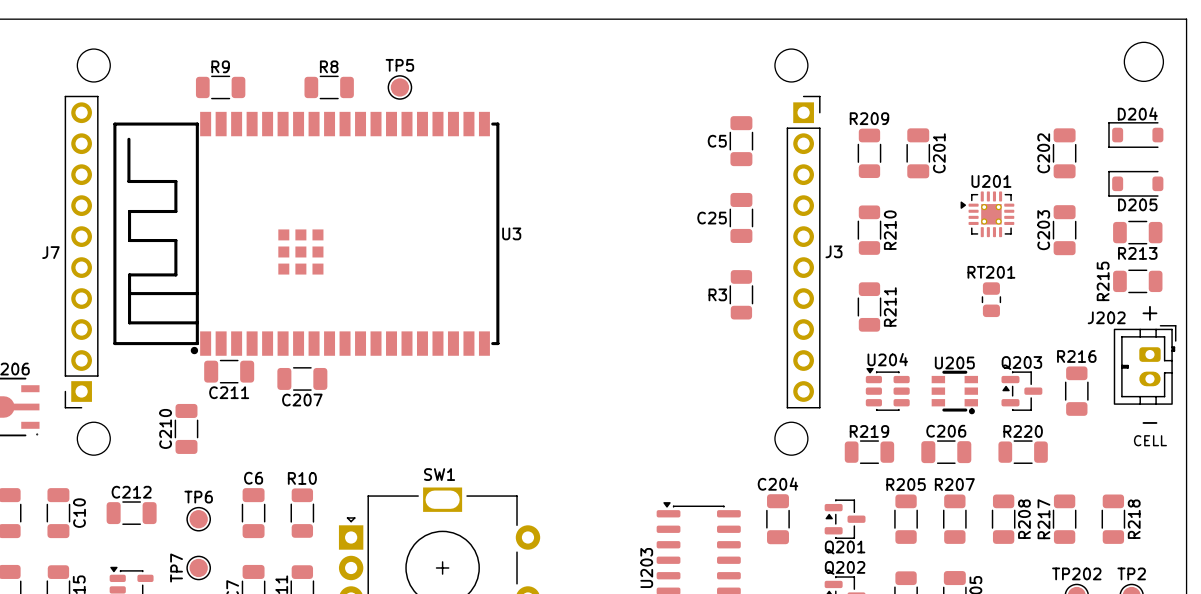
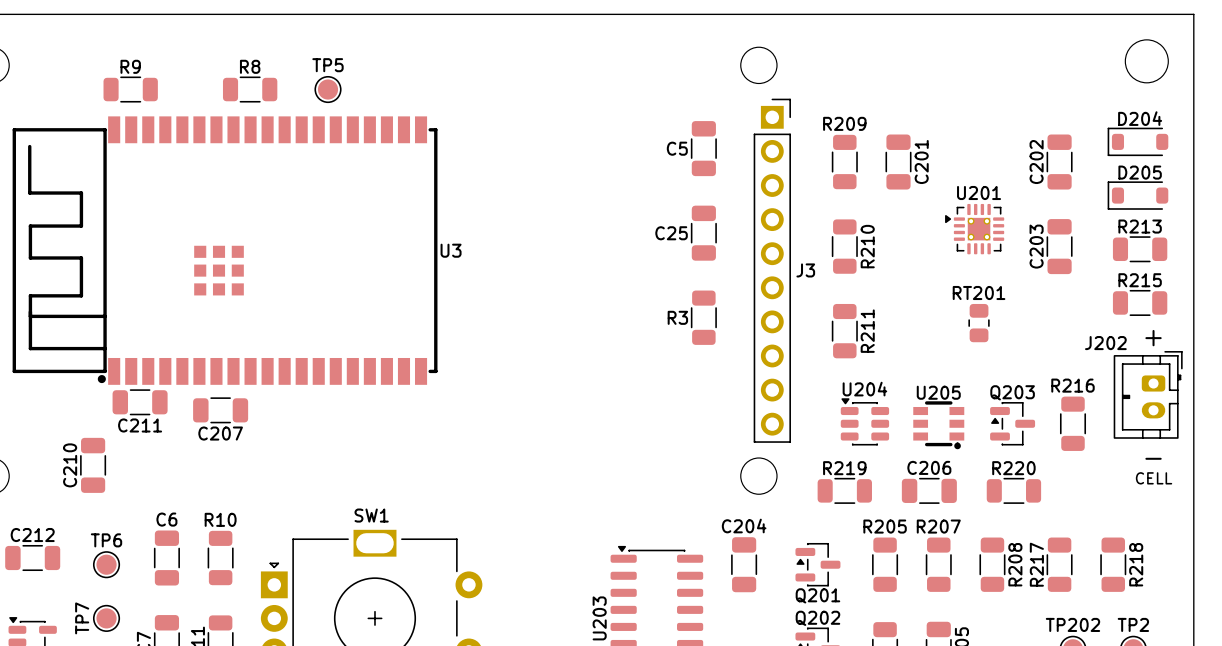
D205 name position: D205 (1137, 204) -> D205 (1140, 172)
R213 name position: R213 (1137, 253) -> R213 (1140, 226)
R215 name rotation: 0° (1103, 281) -> 90° clockwise (1140, 280)

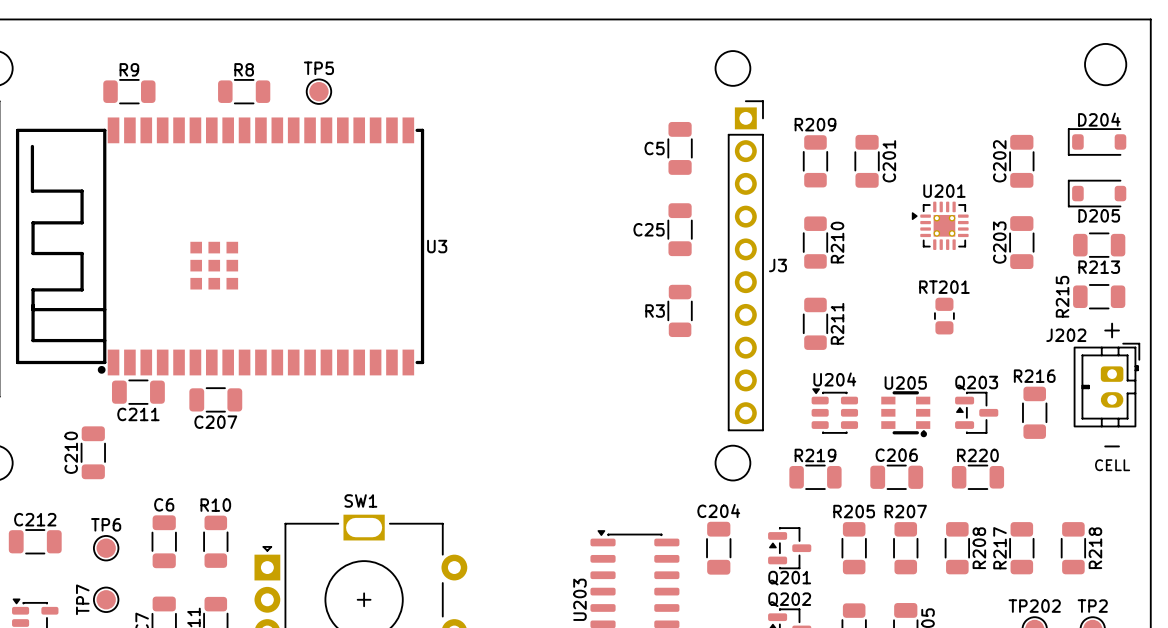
D205 name position: D205 (1140, 172) -> D205 (1099, 215)
R213 name position: R213 (1140, 226) -> R213 (1099, 267)
R215 name rotation: 0° (1140, 280) -> 90° counterclockwise (1062, 296)

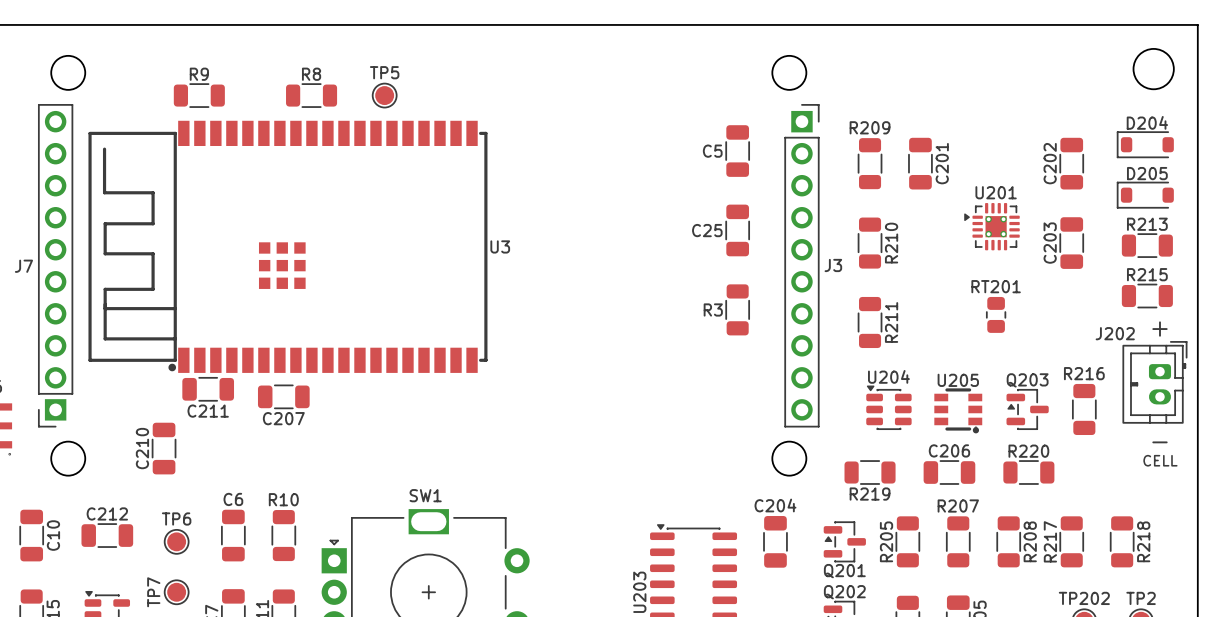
D205 name position: D205 (1099, 215) -> D205 (1147, 173)
R213 name position: R213 (1099, 267) -> R213 (1147, 224)
R215 name rotation: 0° (1062, 296) -> 90° clockwise (1147, 274)
R219 name position: R219 (815, 455) -> R219 (870, 494)
R205 name rotation: 0° (854, 511) -> 90° counterclockwise (886, 541)

